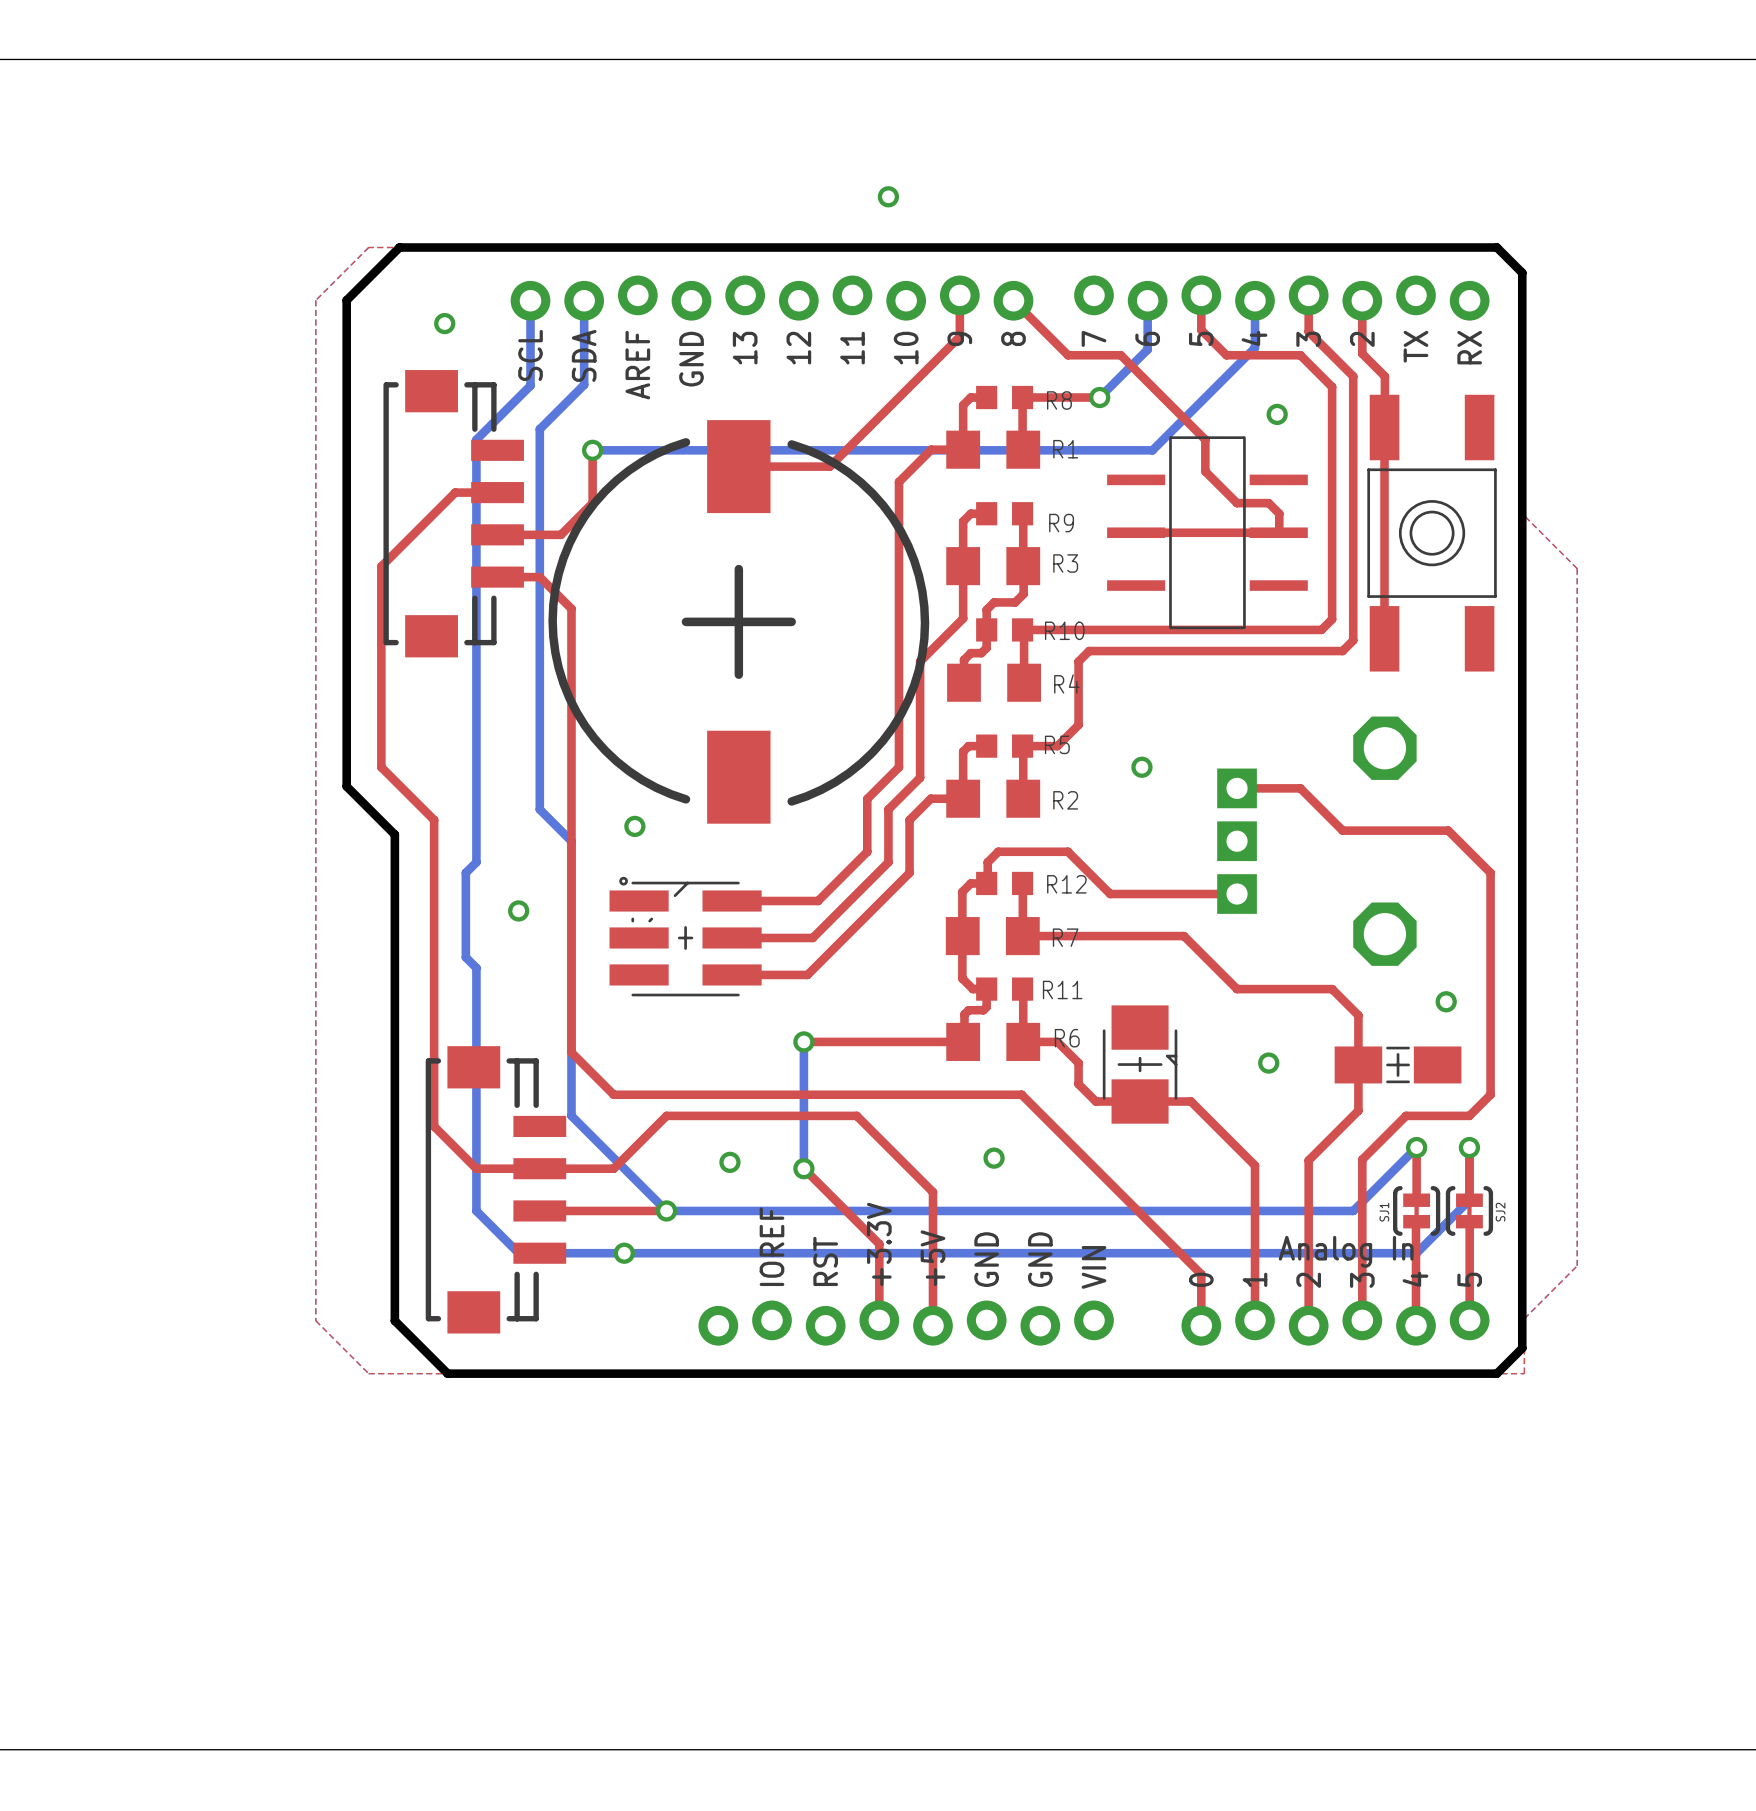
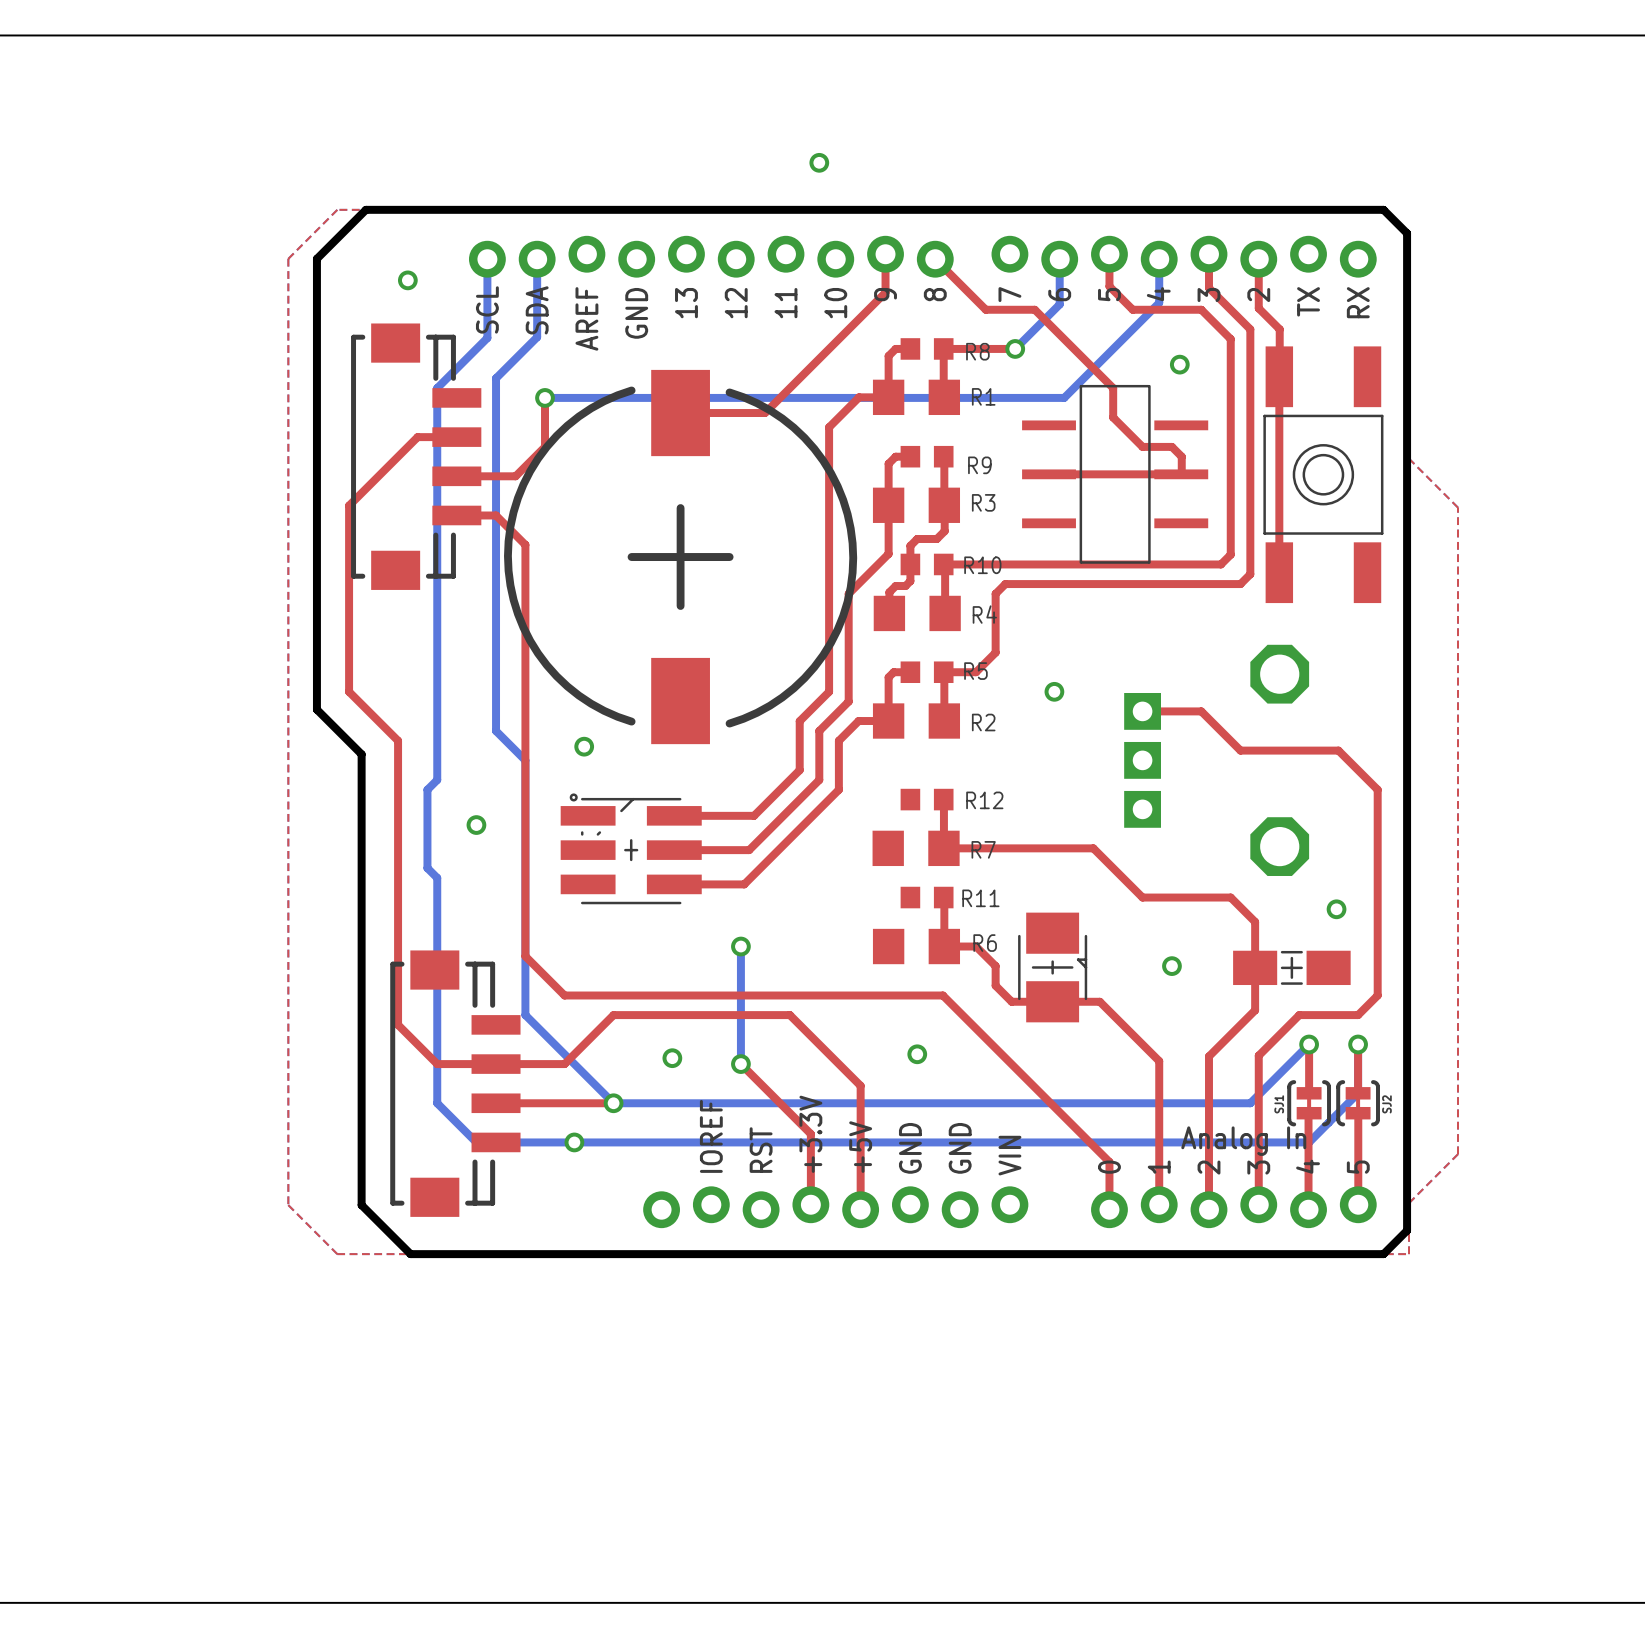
top track: (1237, 894) (1110, 894) (1068, 851) (998, 851) (987, 862) (987, 882) (970, 883) (962, 891) (962, 978) (972, 989) (986, 989) (986, 1007) (983, 1010) (968, 1010) (964, 1014) (963, 1041) (803, 1041) -> none

